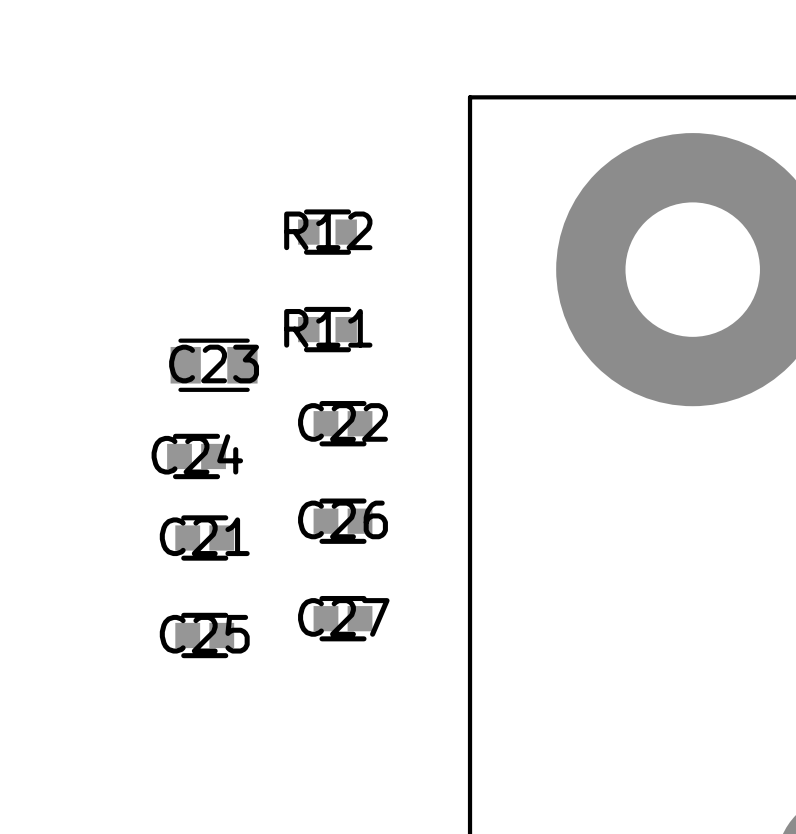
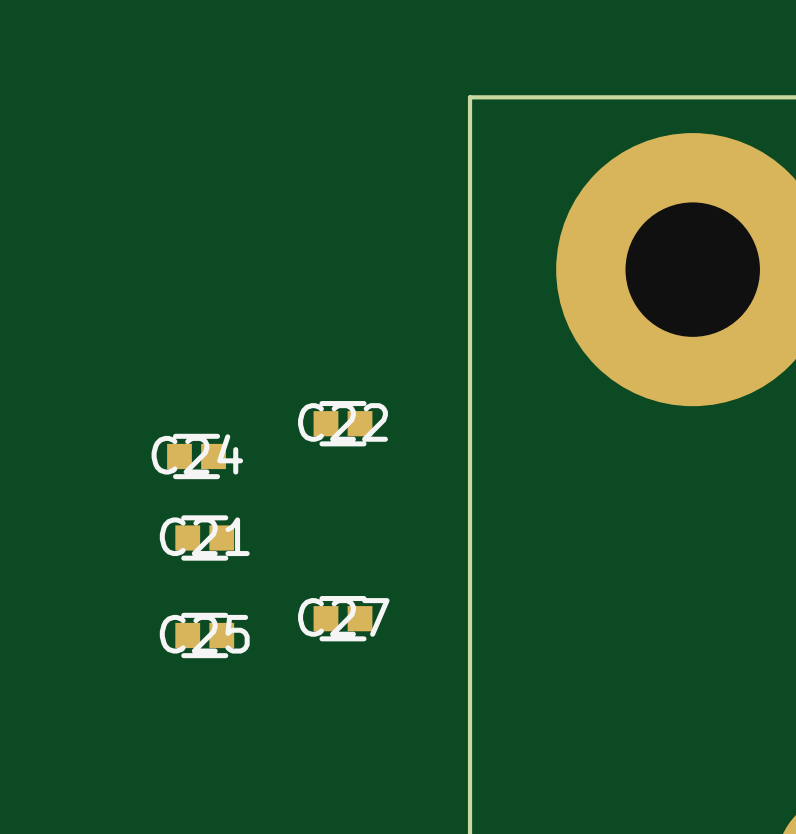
R12: (327, 232) -> none
R11: (327, 329) -> none
C23: (214, 365) -> none
C26: (342, 521) -> none

